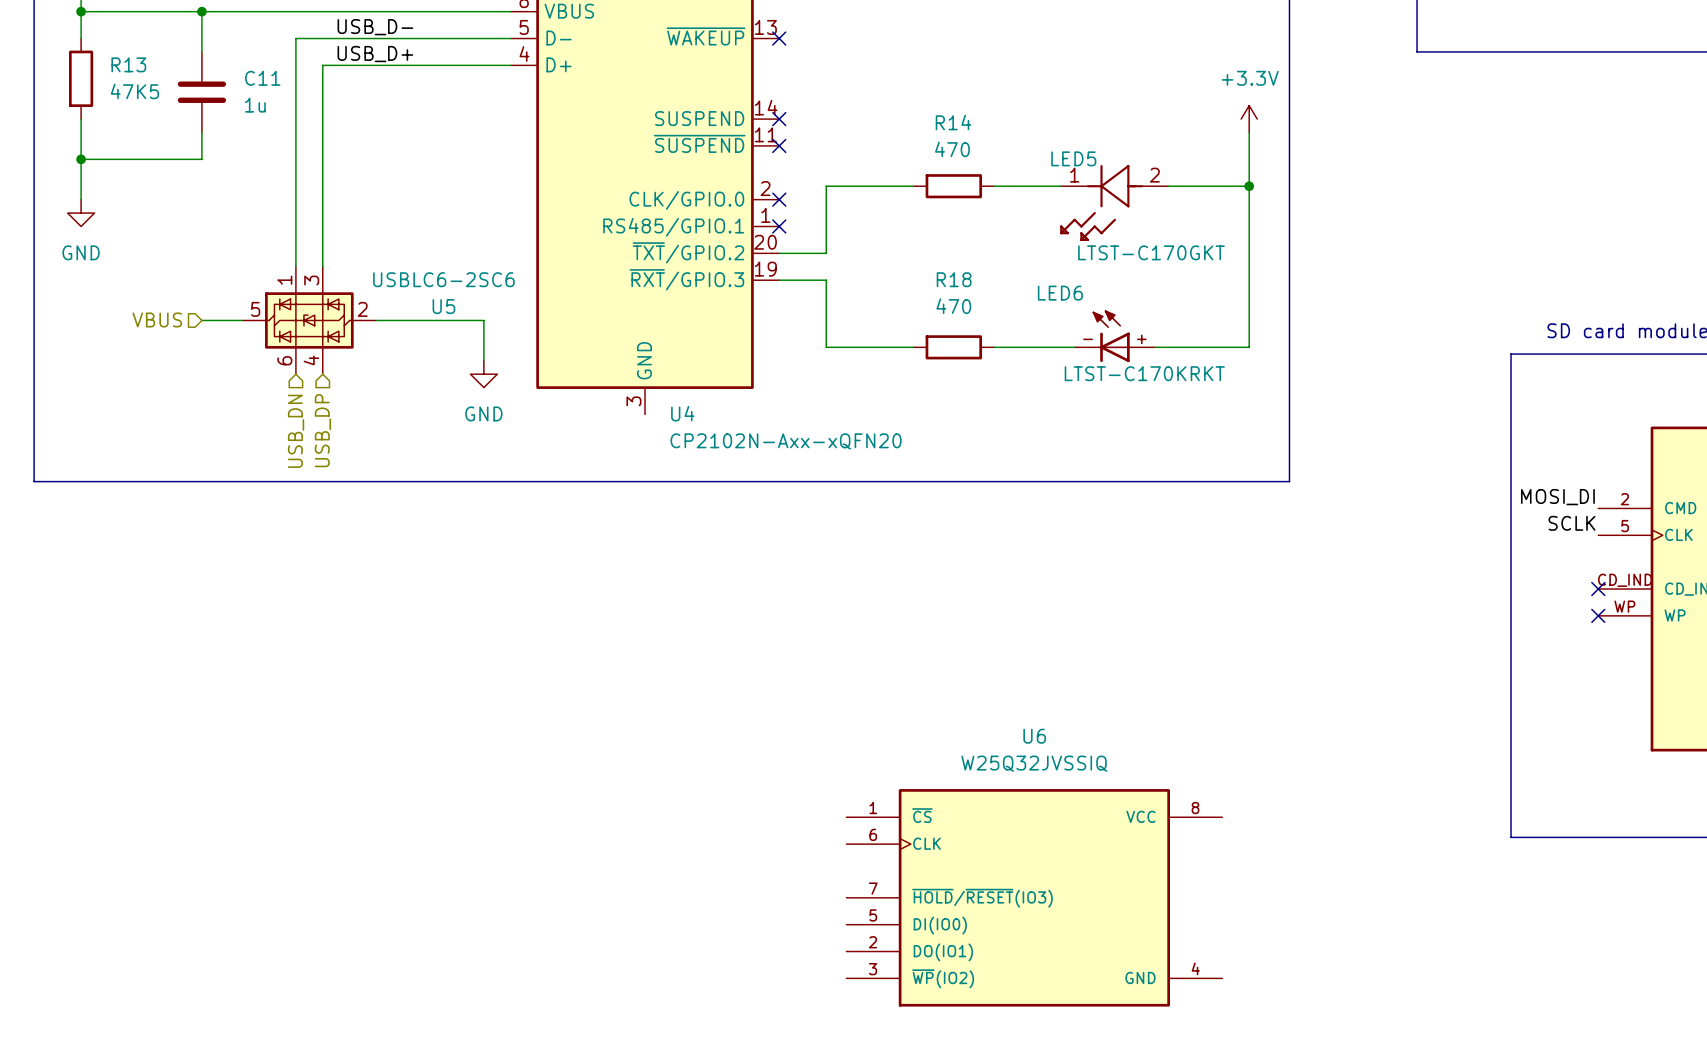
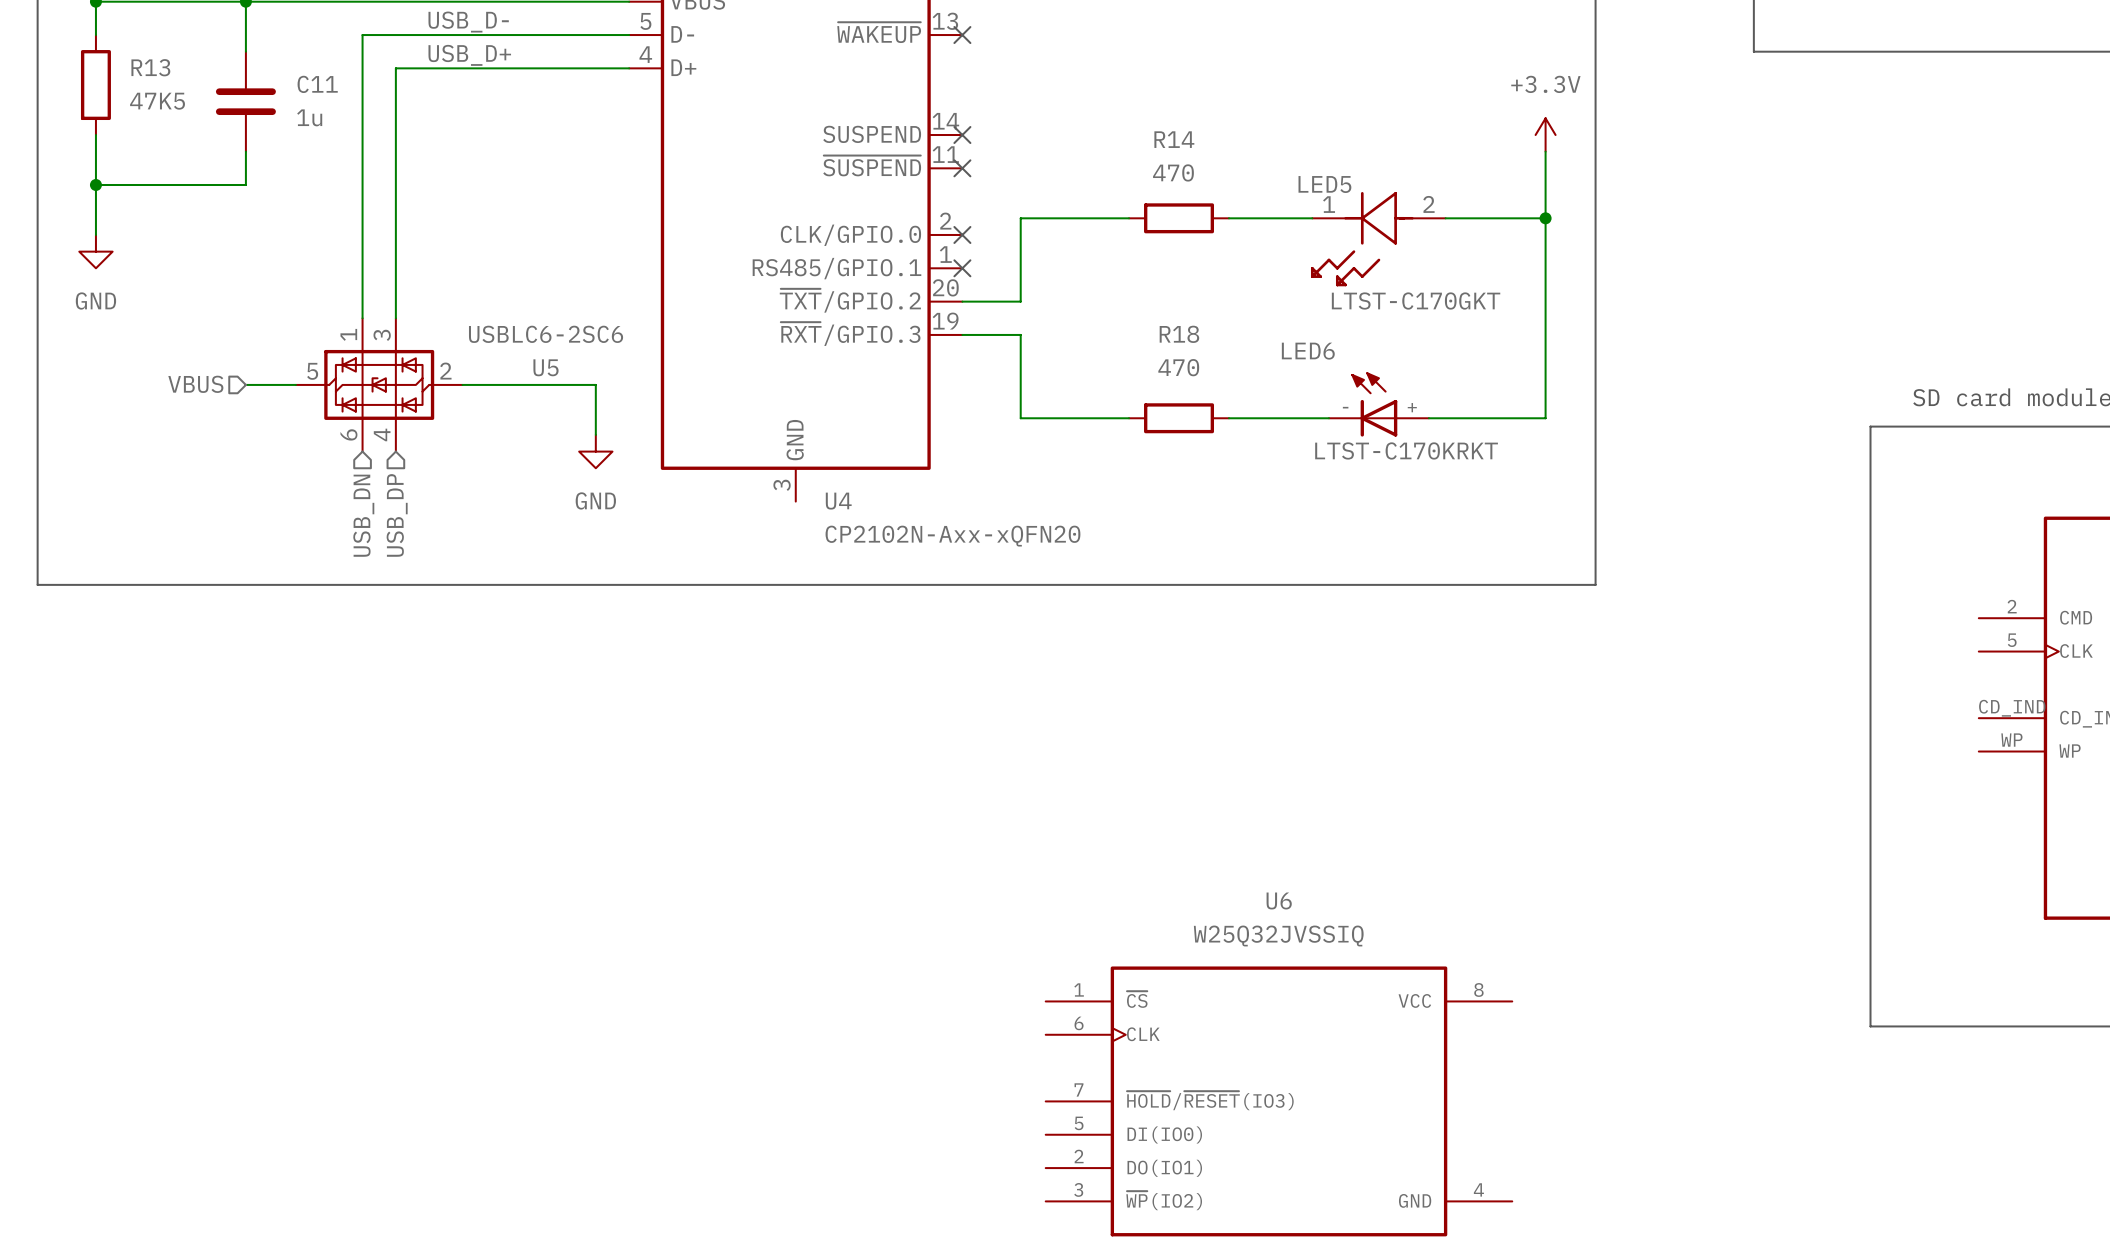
label: MOSI_DI (1557, 497) -> none
label: SCLK (1571, 523) -> none
no-connect mark: (1598, 589) -> none
no-connect mark: (1598, 615) -> none

